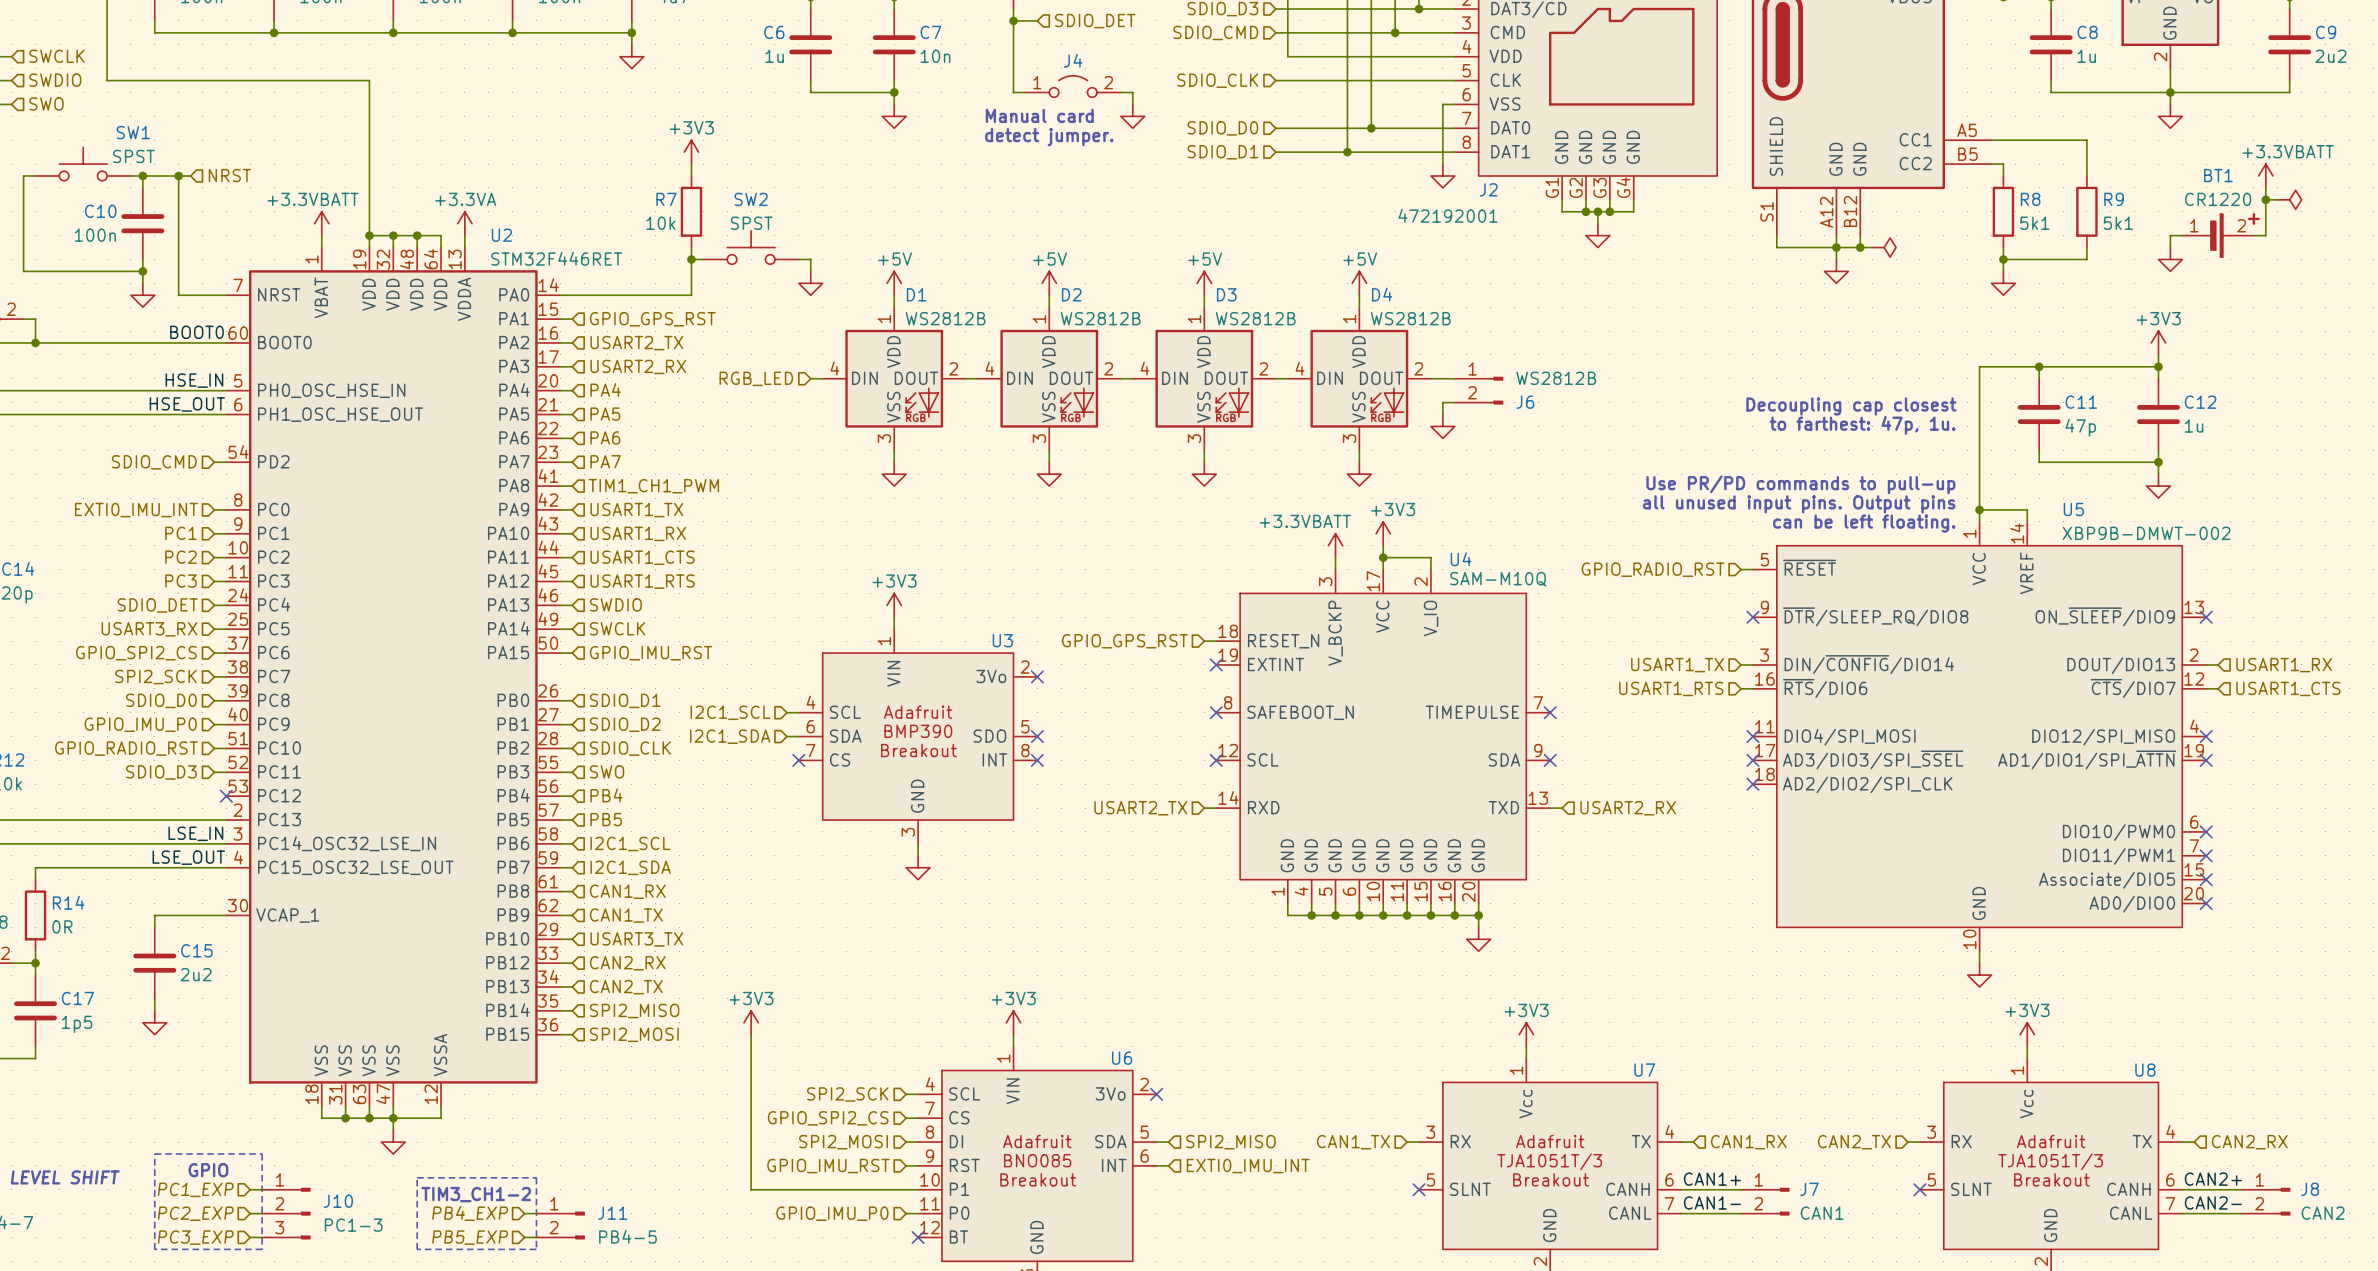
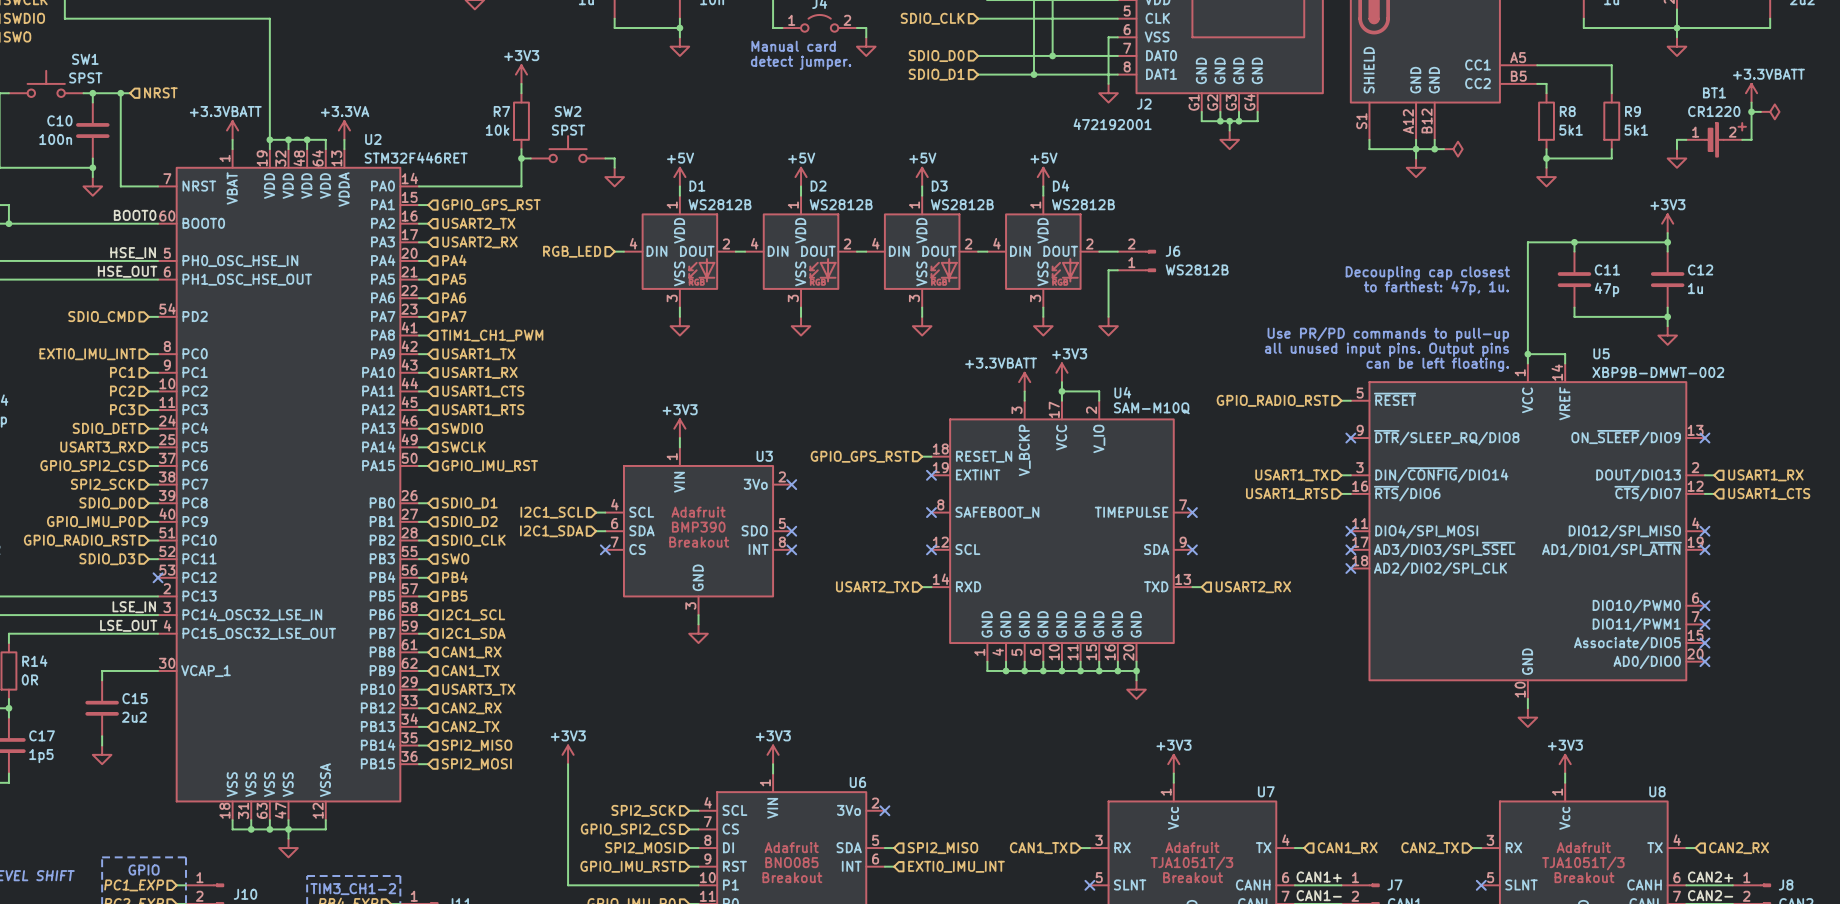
J6 flip: as is (1496, 390) -> up-down (1150, 260)
wire: none -> (1108, 279) (1108, 316)
power symbol position: (1442, 426) -> (1108, 326)

